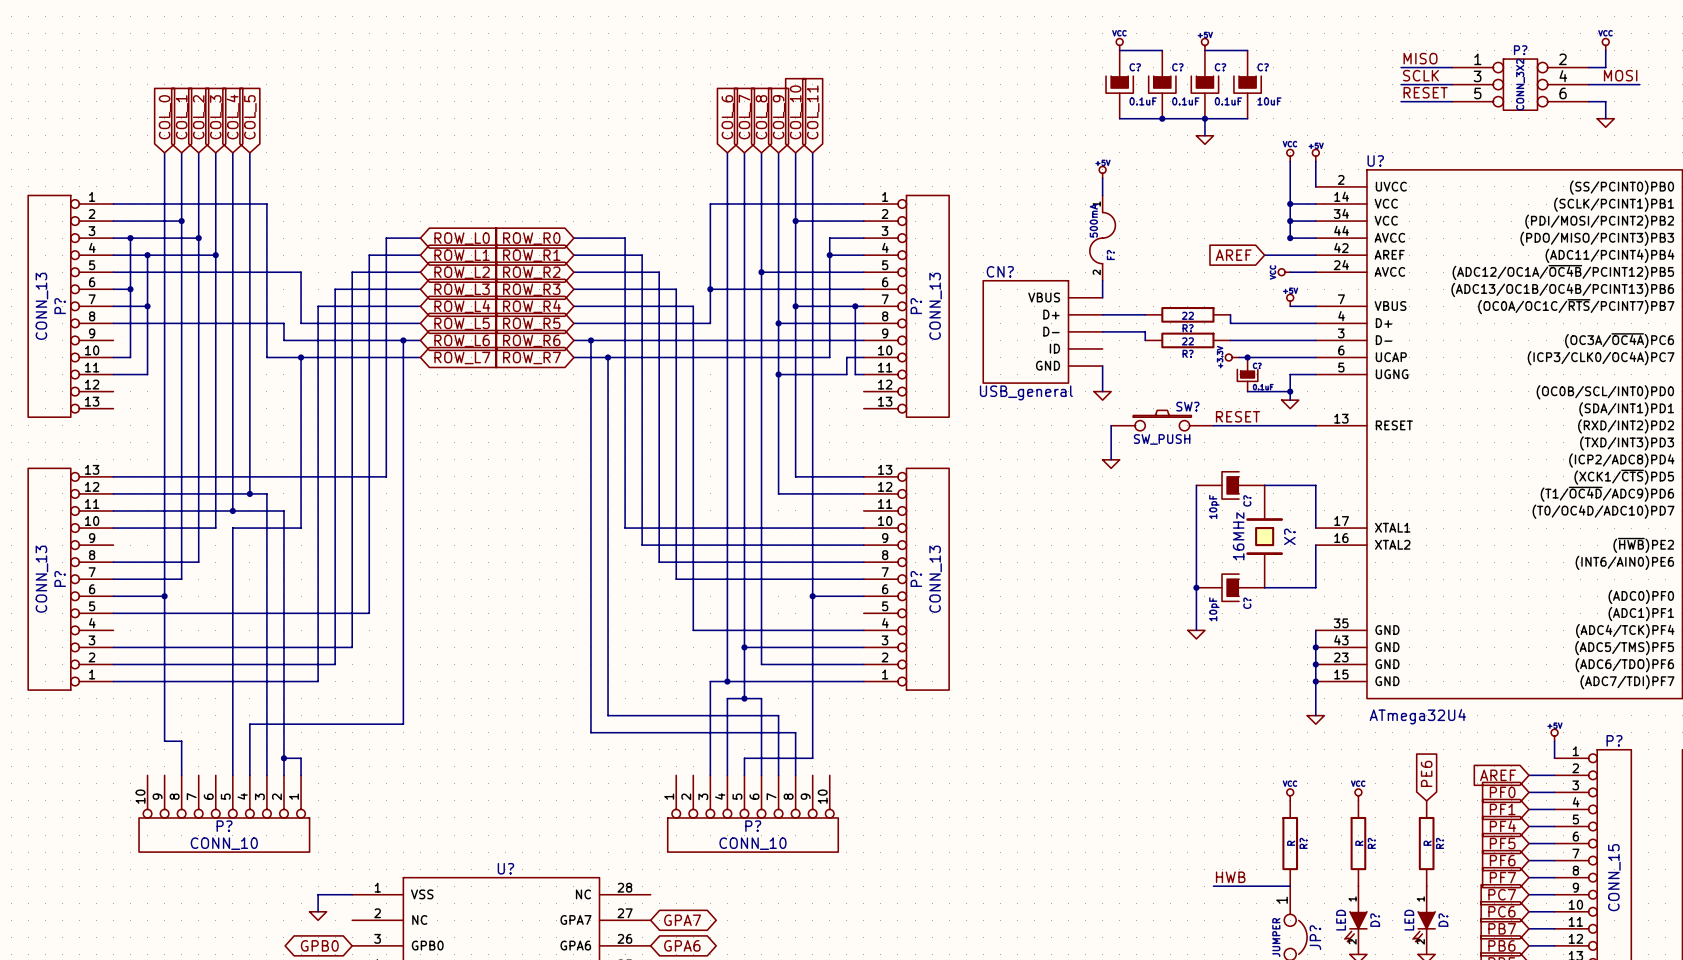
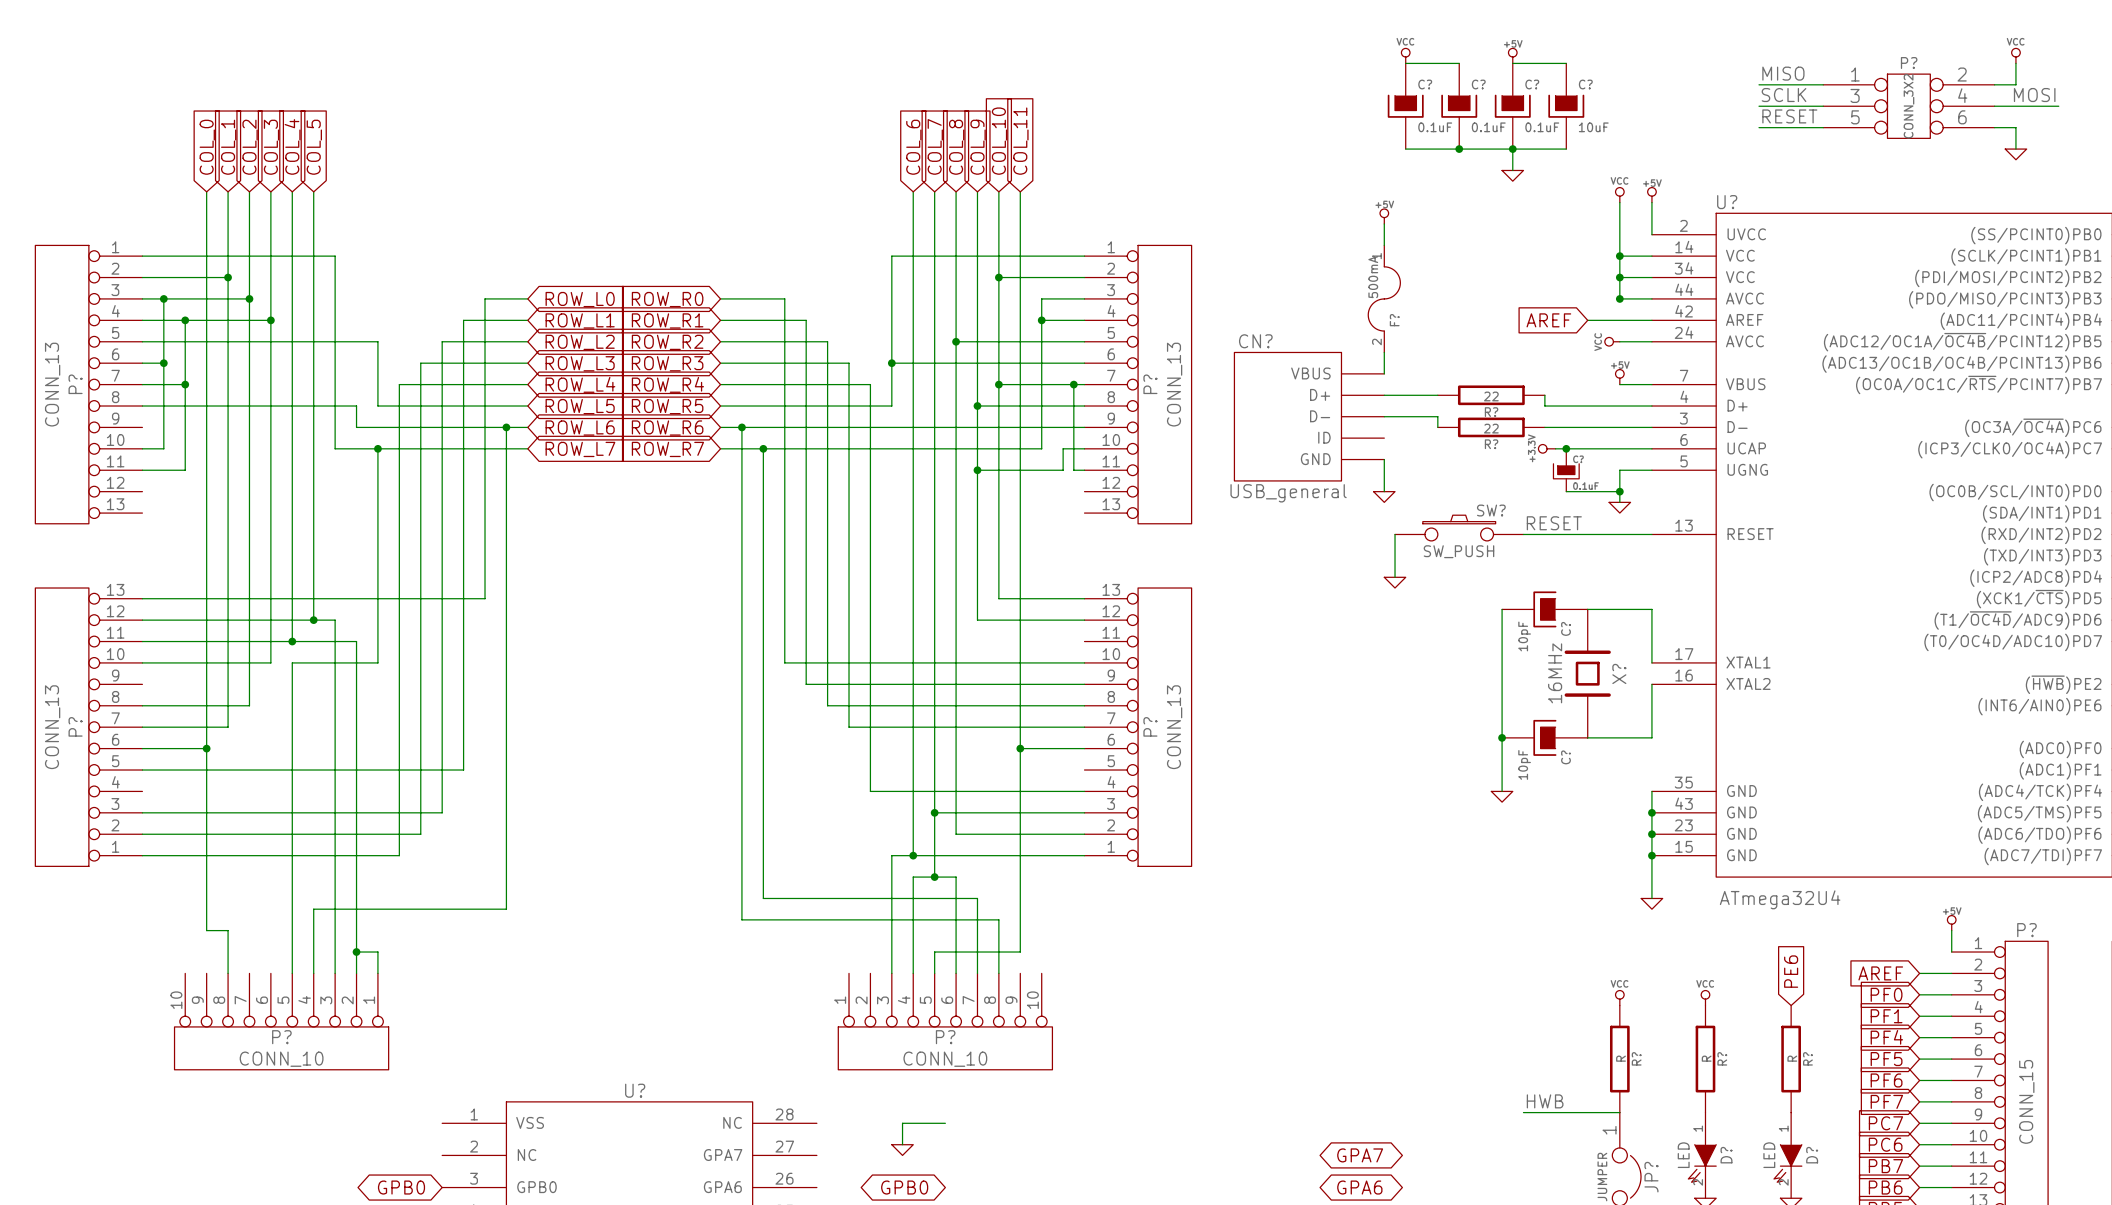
wire: (352, 894) (318, 894) (318, 911) -> none
wire: none -> (945, 1123) (902, 1123) (902, 1144)
power symbol: (318, 916) -> none
power symbol: none -> (902, 1150)
global label: GPA7 (682, 920) -> none
global label: none -> GPA7 (1360, 1155)
global label: GPA6 (682, 945) -> none
global label: none -> GPB0 (904, 1187)
global label: none -> GPA6 (1359, 1187)

